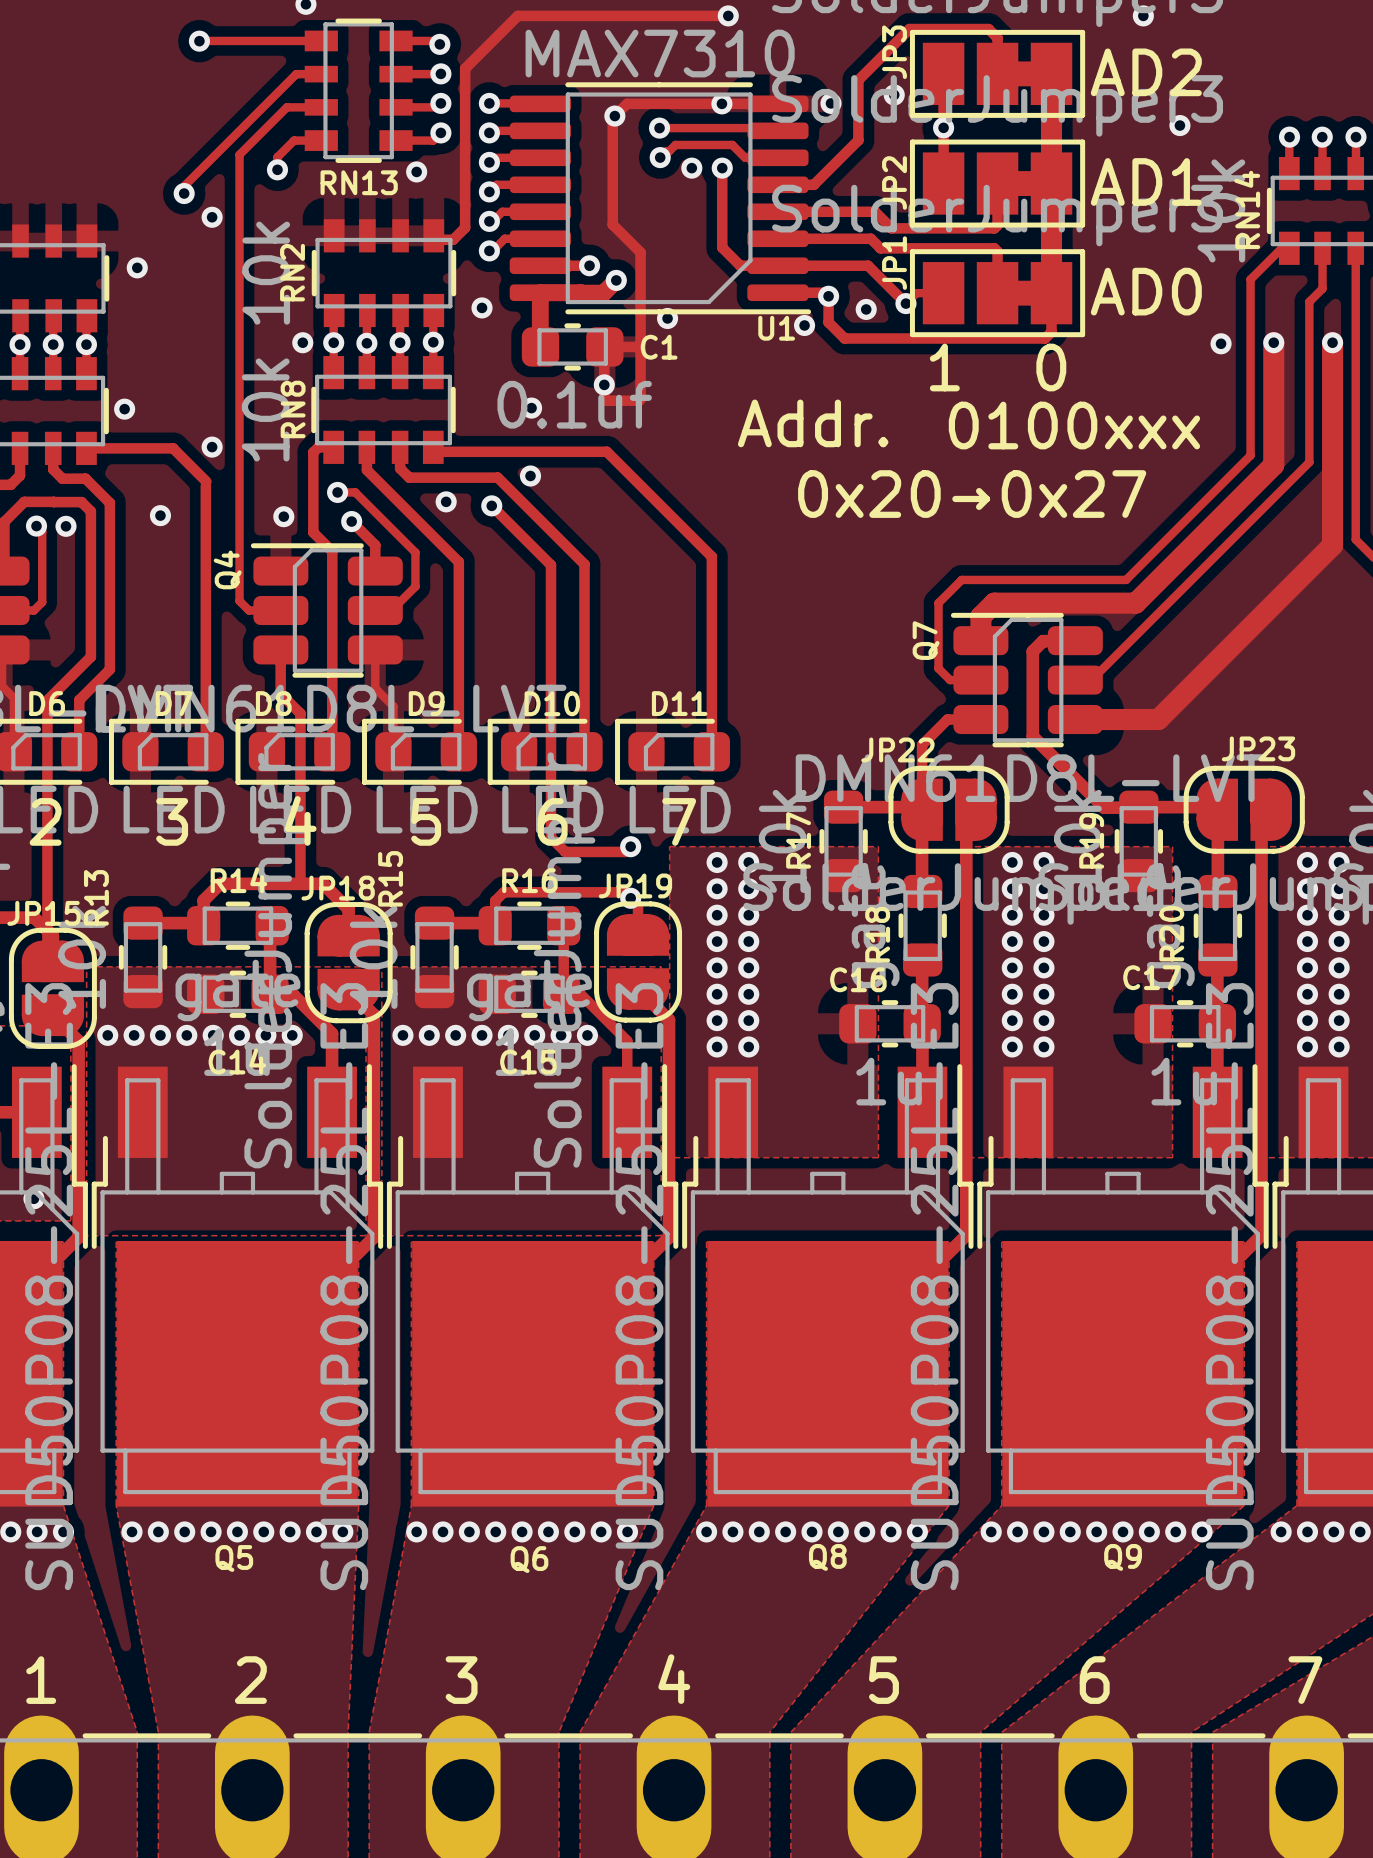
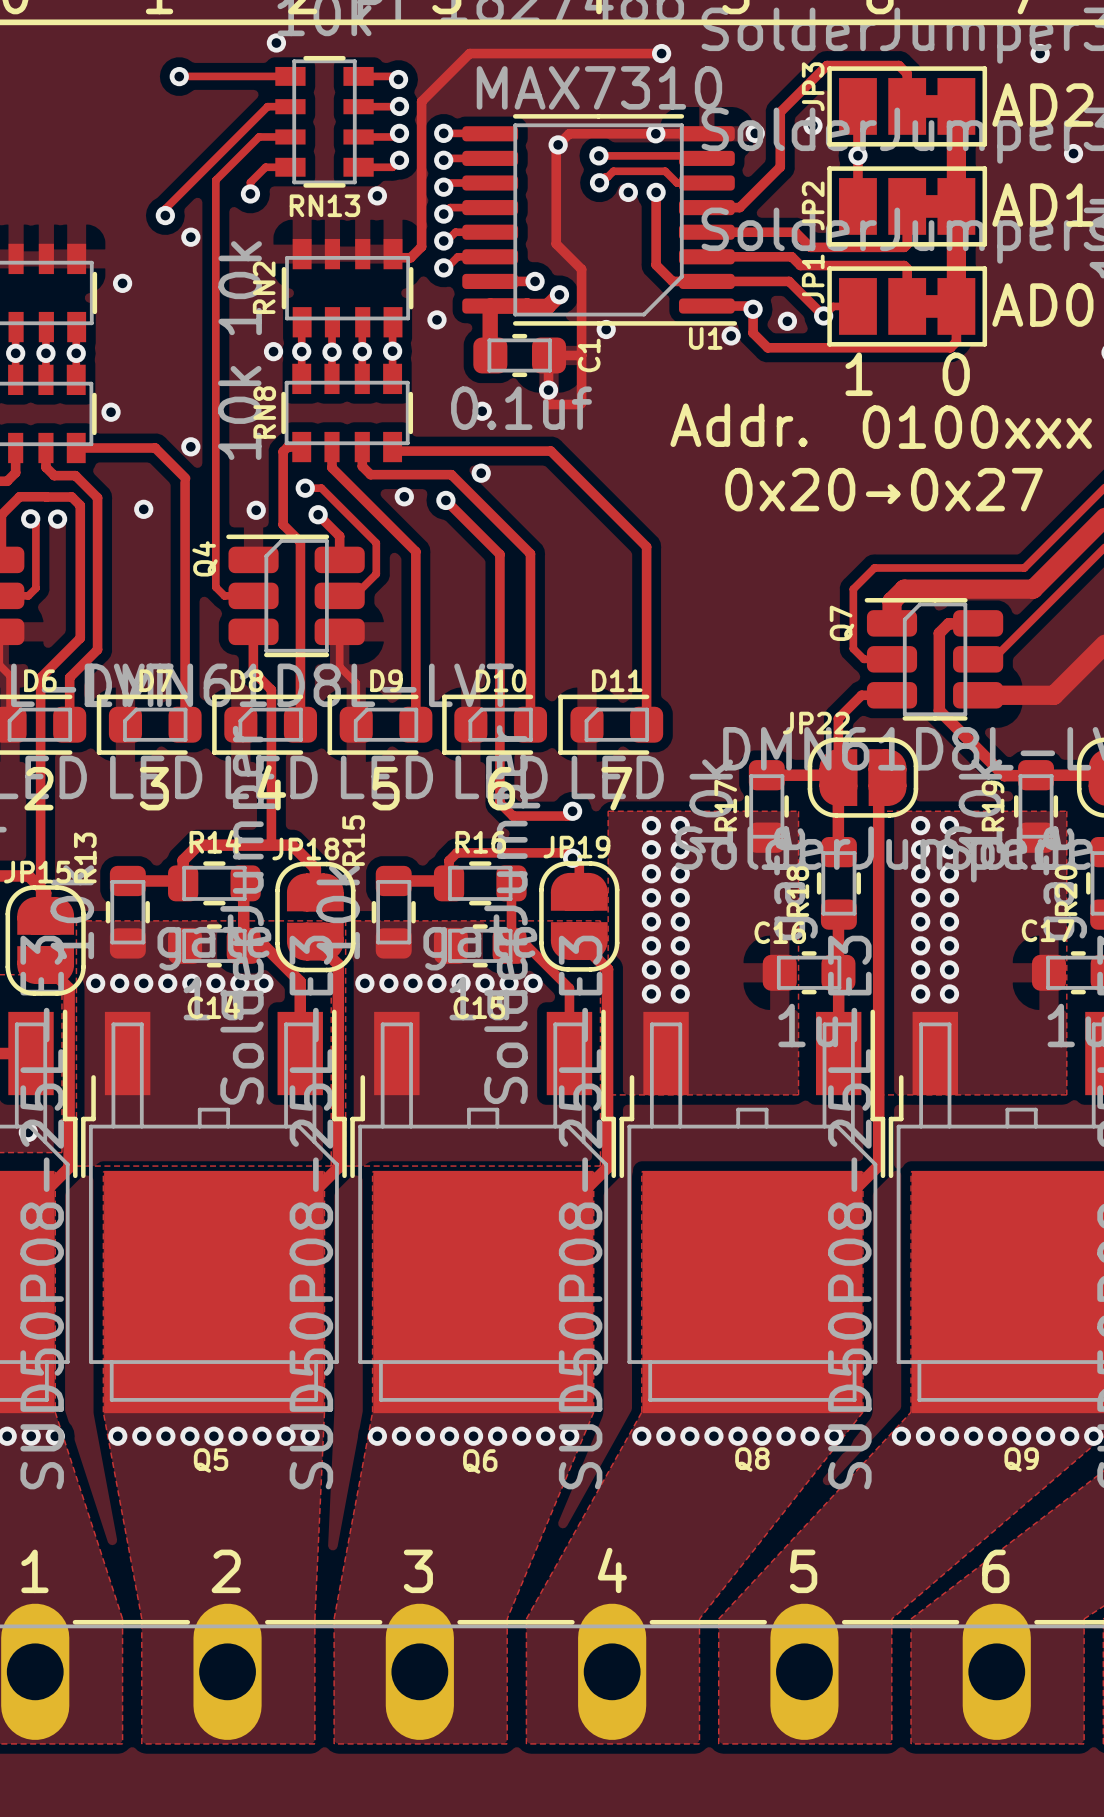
C1 name rotation: 0° (659, 347) -> 90° counterclockwise (589, 355)

